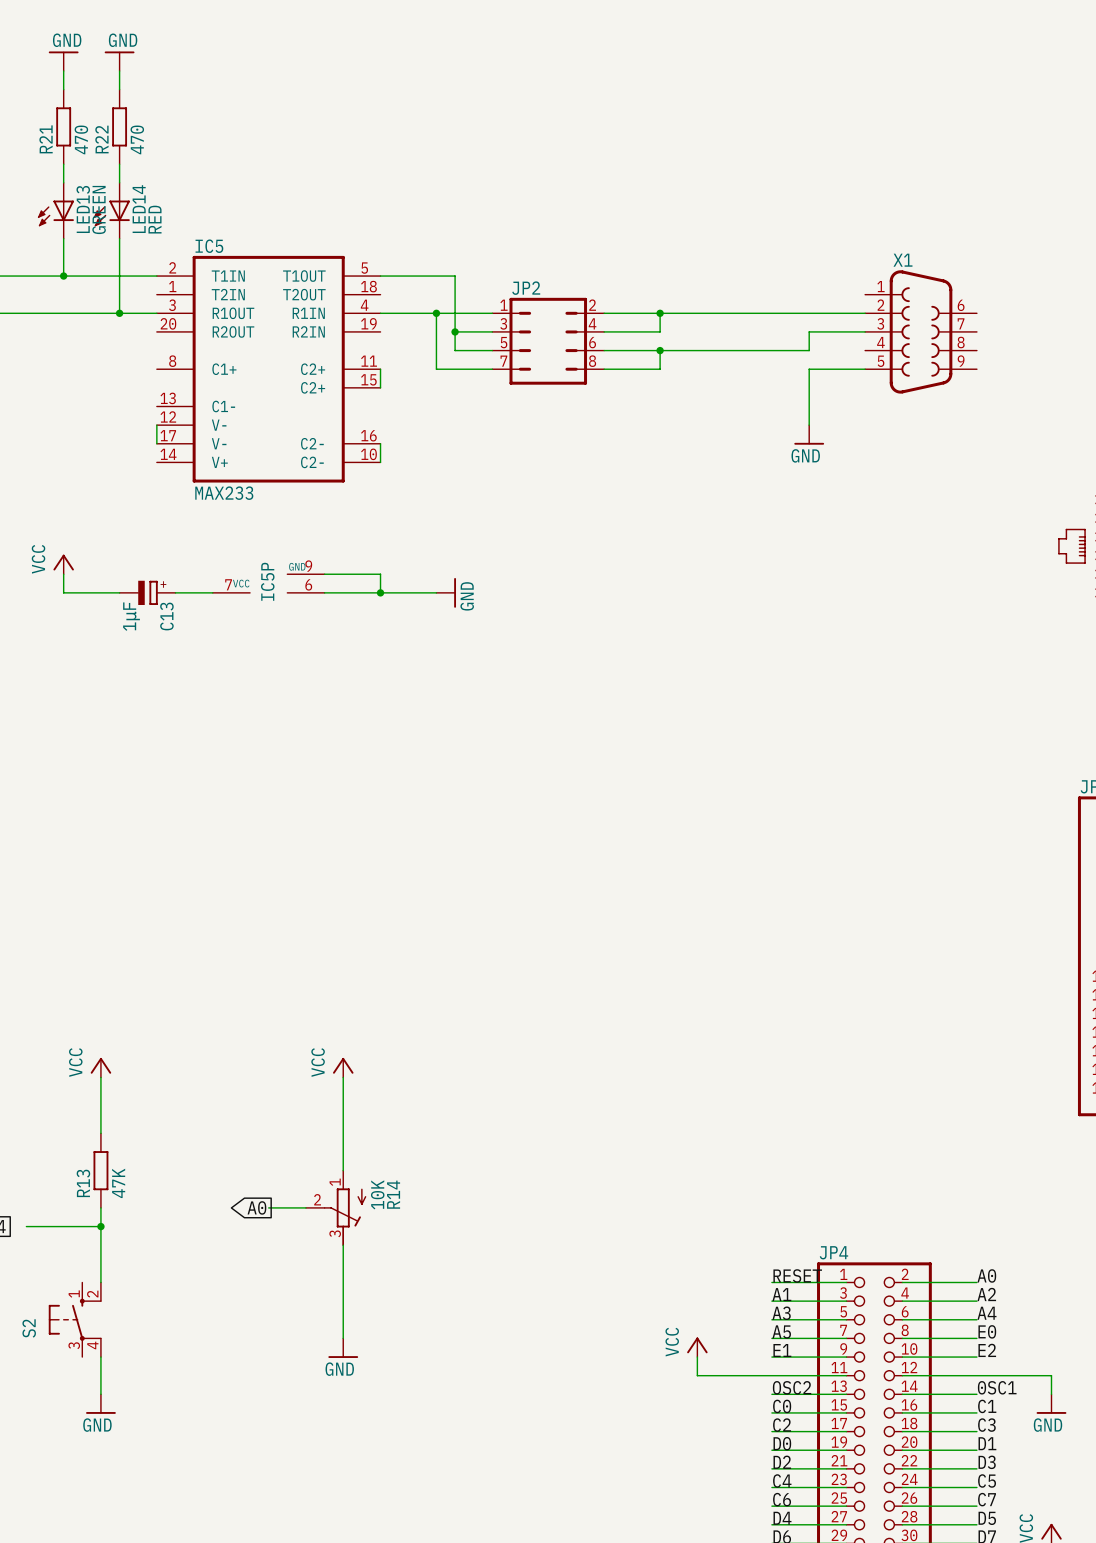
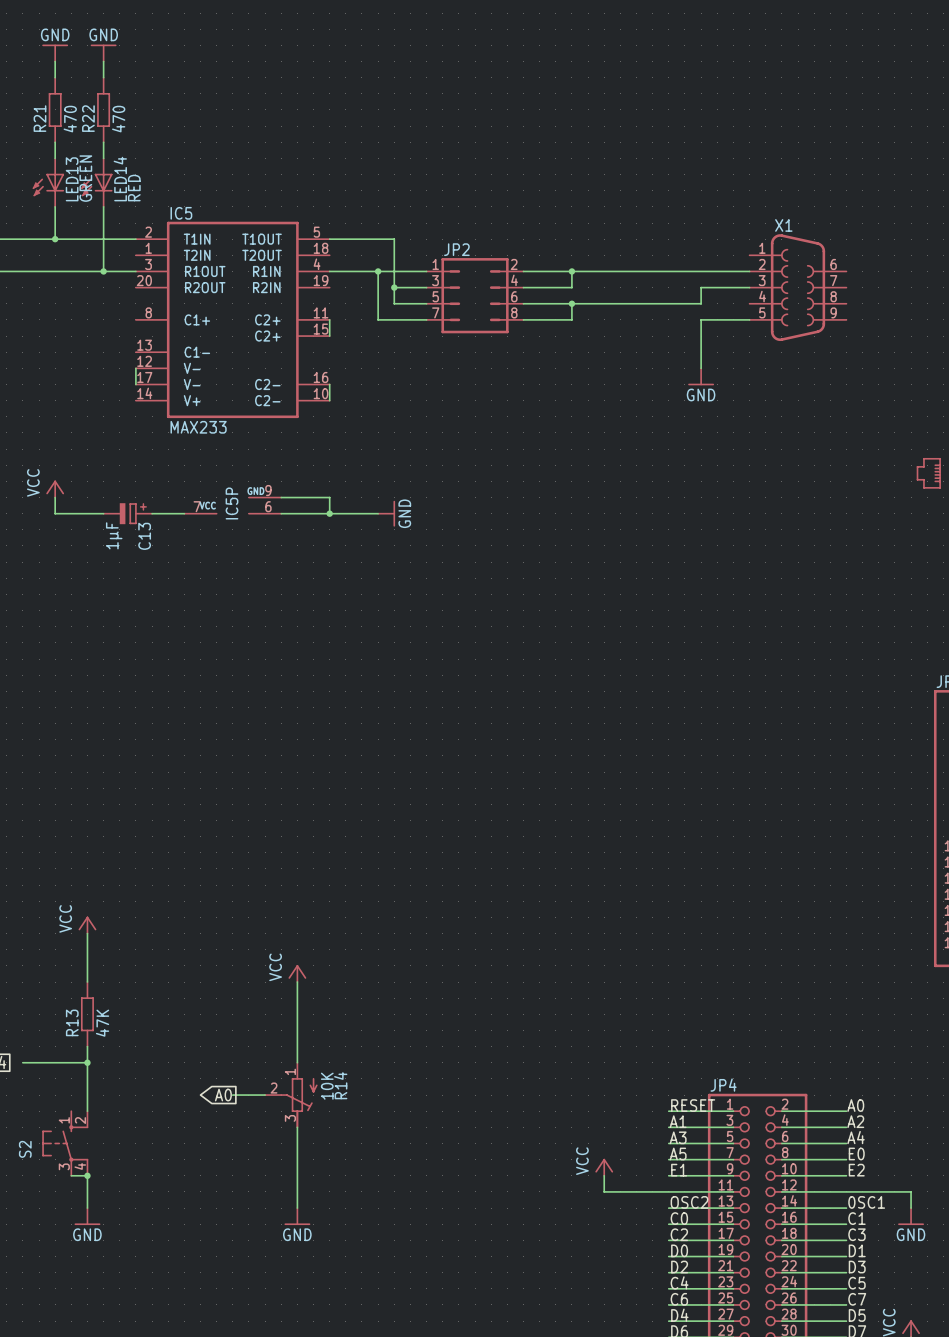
power symbol position: VCC (343, 1067) -> VCC (297, 973)
wire: (343, 1077) (343, 1133) -> none
global label position: A0 (256, 1207) -> A0 (223, 1095)
wire: (268, 1207) (305, 1207) -> (232, 1095) (265, 1095)
R14 position: (336, 1208) -> (291, 1095)
wire: (343, 1245) (343, 1301) -> (297, 1014) (297, 1062)
wire: none -> (297, 1159) (297, 1208)
power symbol position: GND (343, 1348) -> GND (297, 1216)
wire: none -> (71, 1175) (87, 1175)
junction: none -> (87, 1175)

